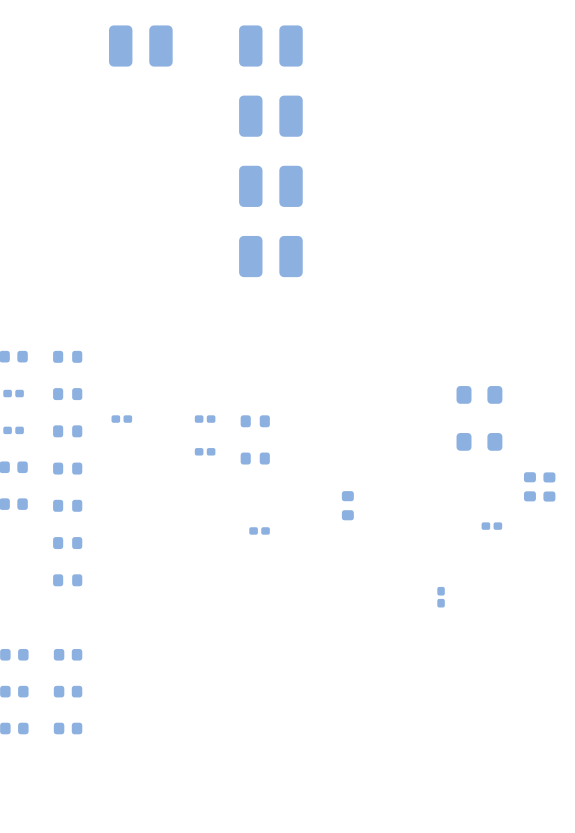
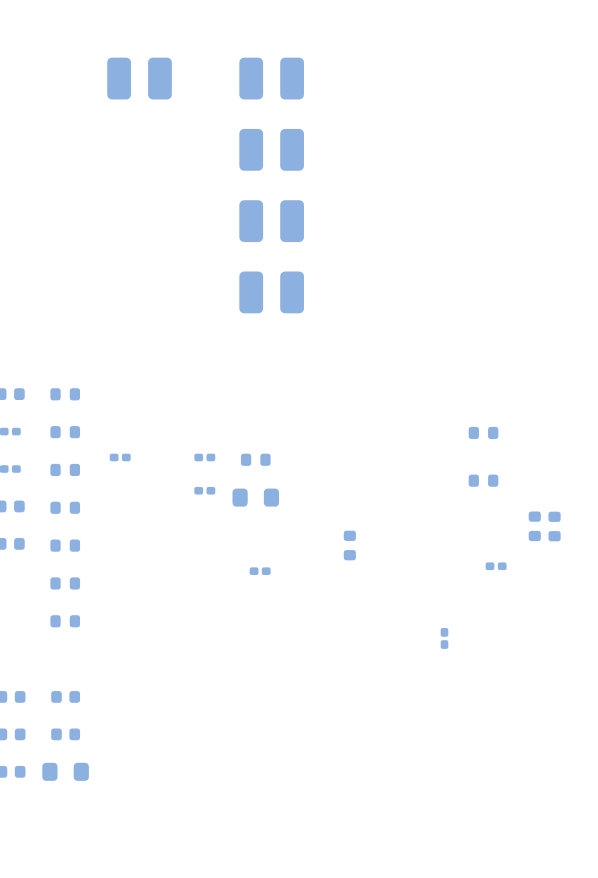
part footprint: [456, 386, 503, 404] -> [468, 426, 499, 440]
part footprint: [456, 432, 503, 451] -> [468, 474, 499, 487]
part footprint: [240, 452, 270, 465] -> [232, 488, 280, 507]
part footprint: [53, 722, 83, 735] -> [42, 762, 89, 781]

